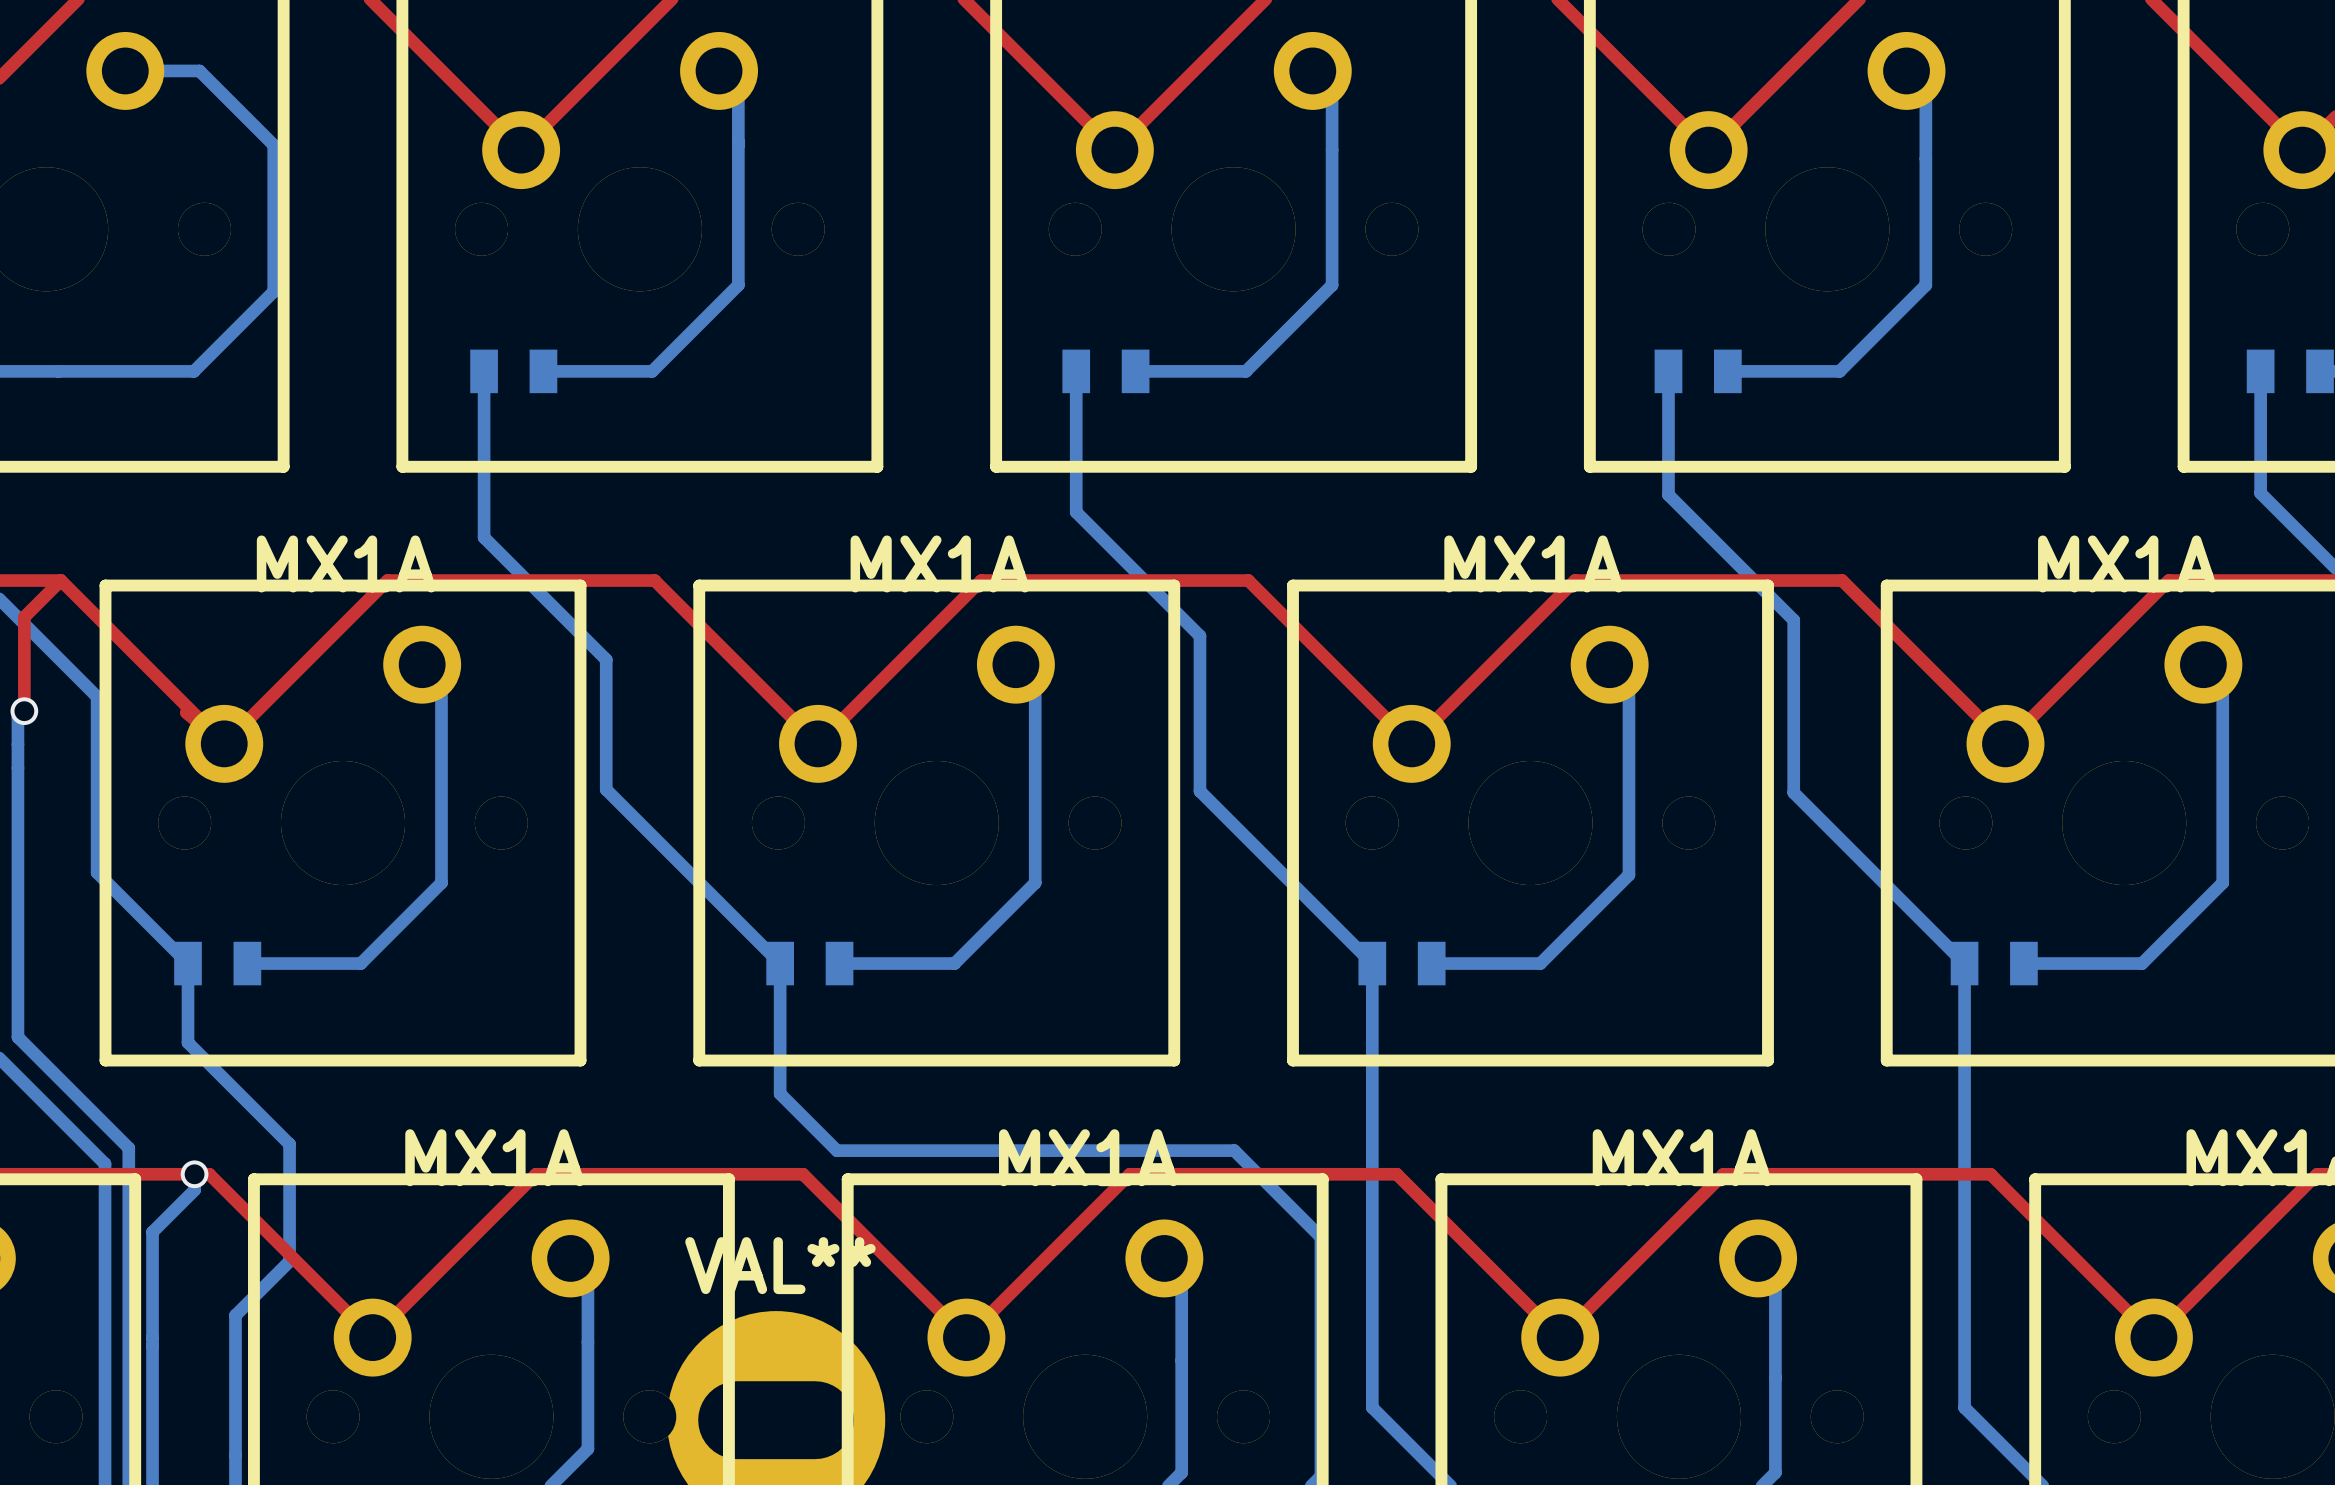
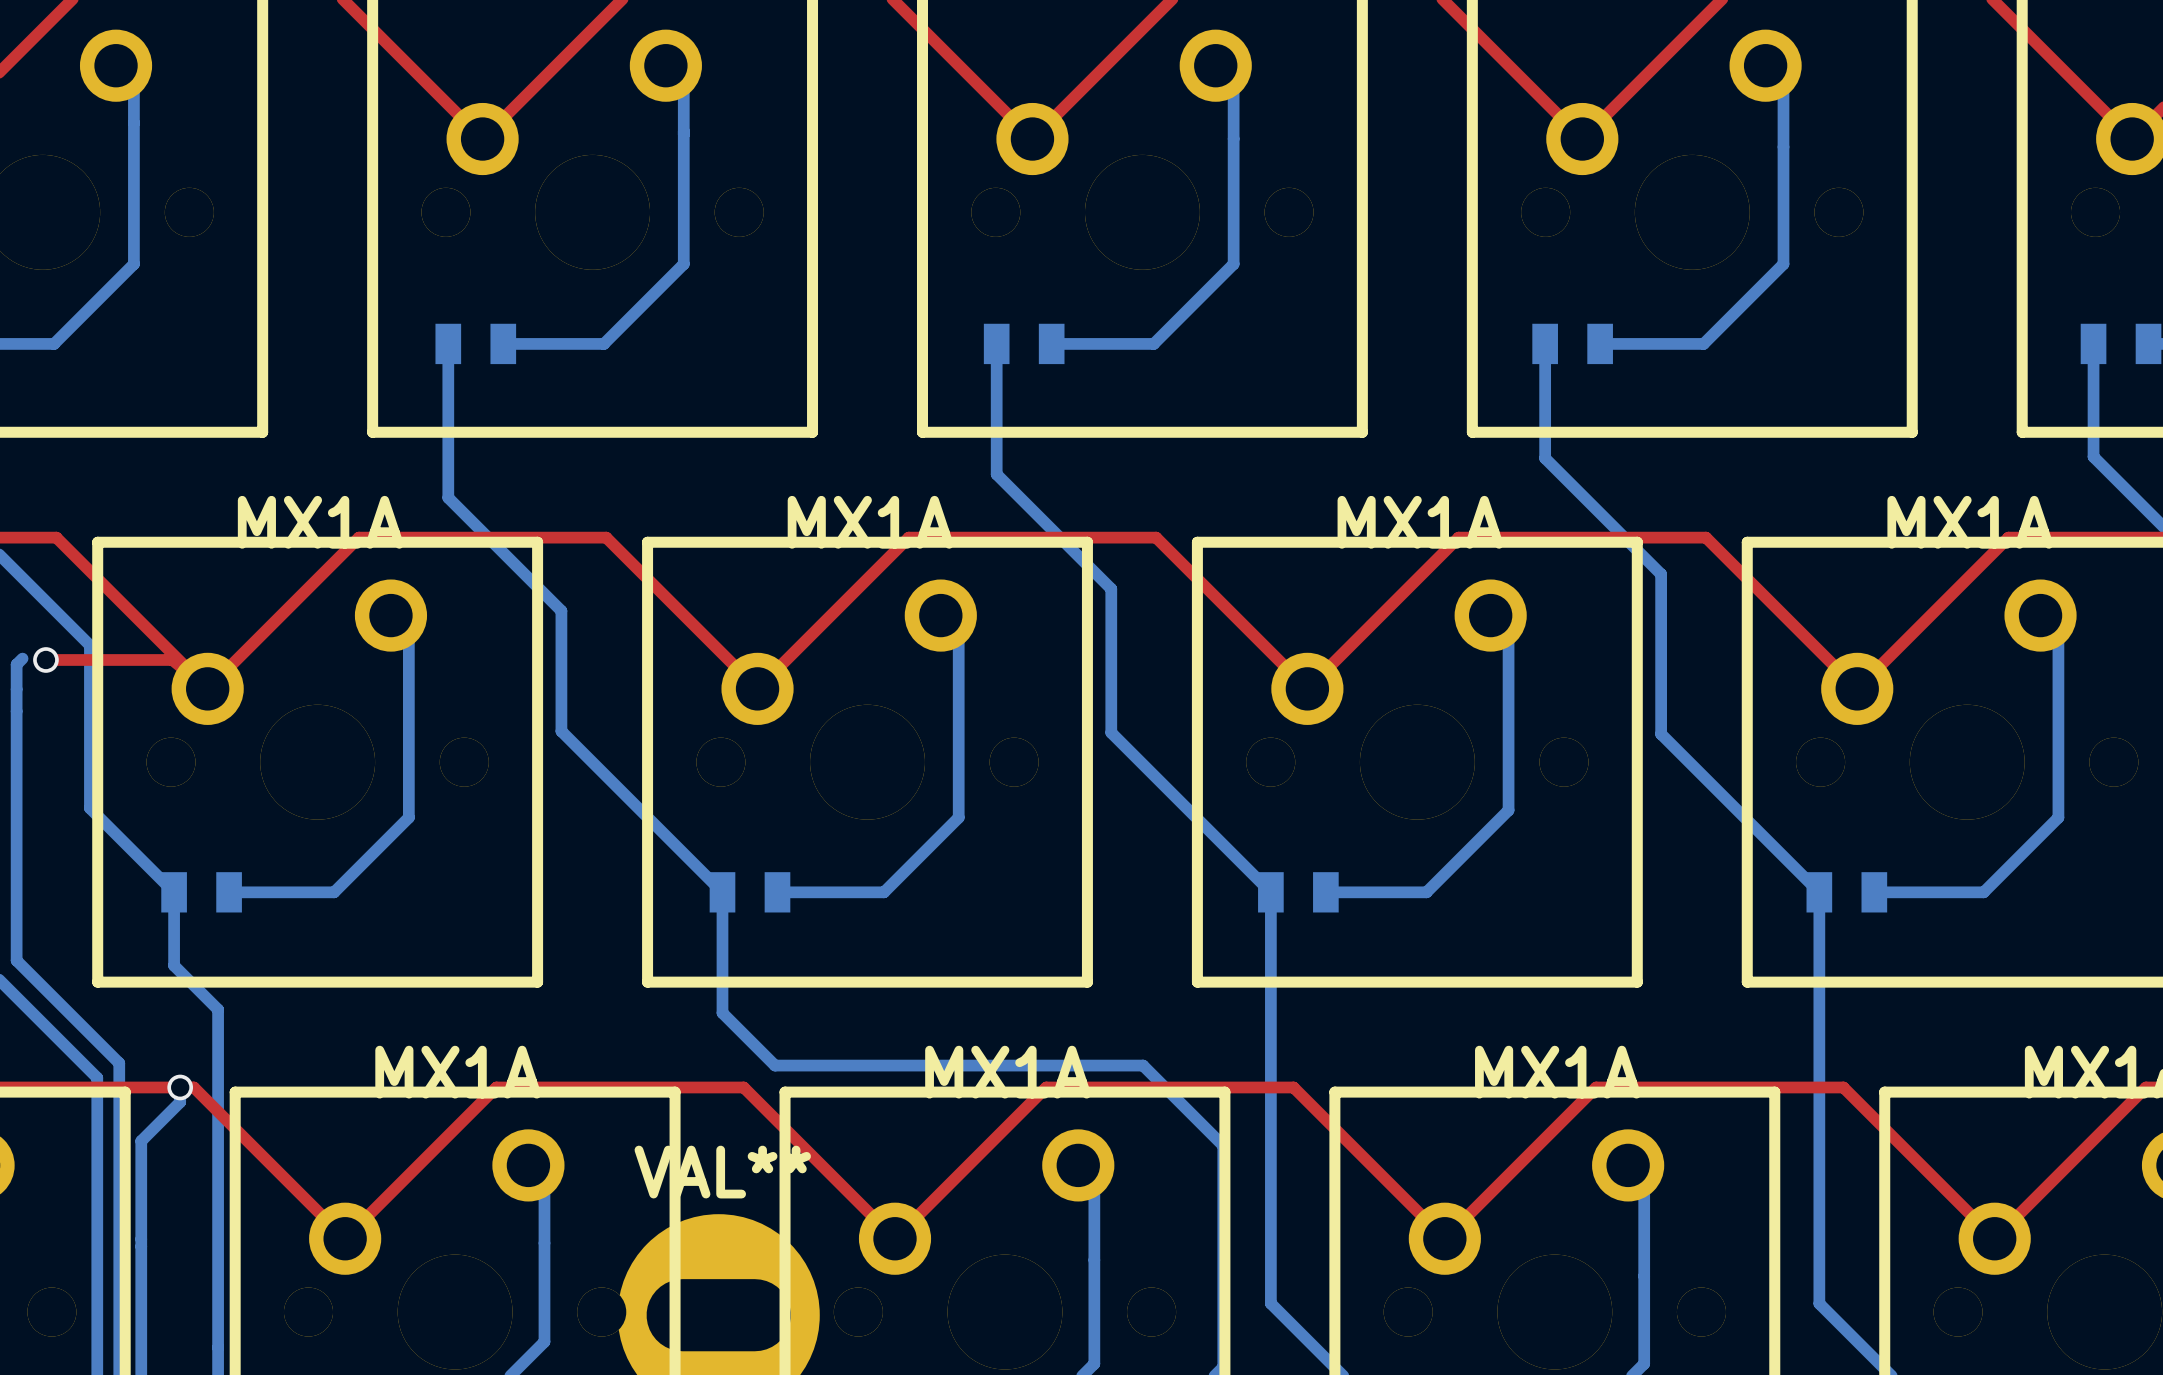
bottom track: (125, 70) (199, 70) (273, 145) (273, 291) (193, 371) (58, 371) -> (116, 65) (133, 83) (133, 264) (54, 343)
top track: (60, 580) (24, 617) (24, 711) -> none
via position: (24, 711) -> (45, 659)
top track: none -> (45, 659) (172, 659)
bottom track: (235, 1090) (289, 1144) (289, 1261) (235, 1315) -> (218, 1009) (218, 1218)

